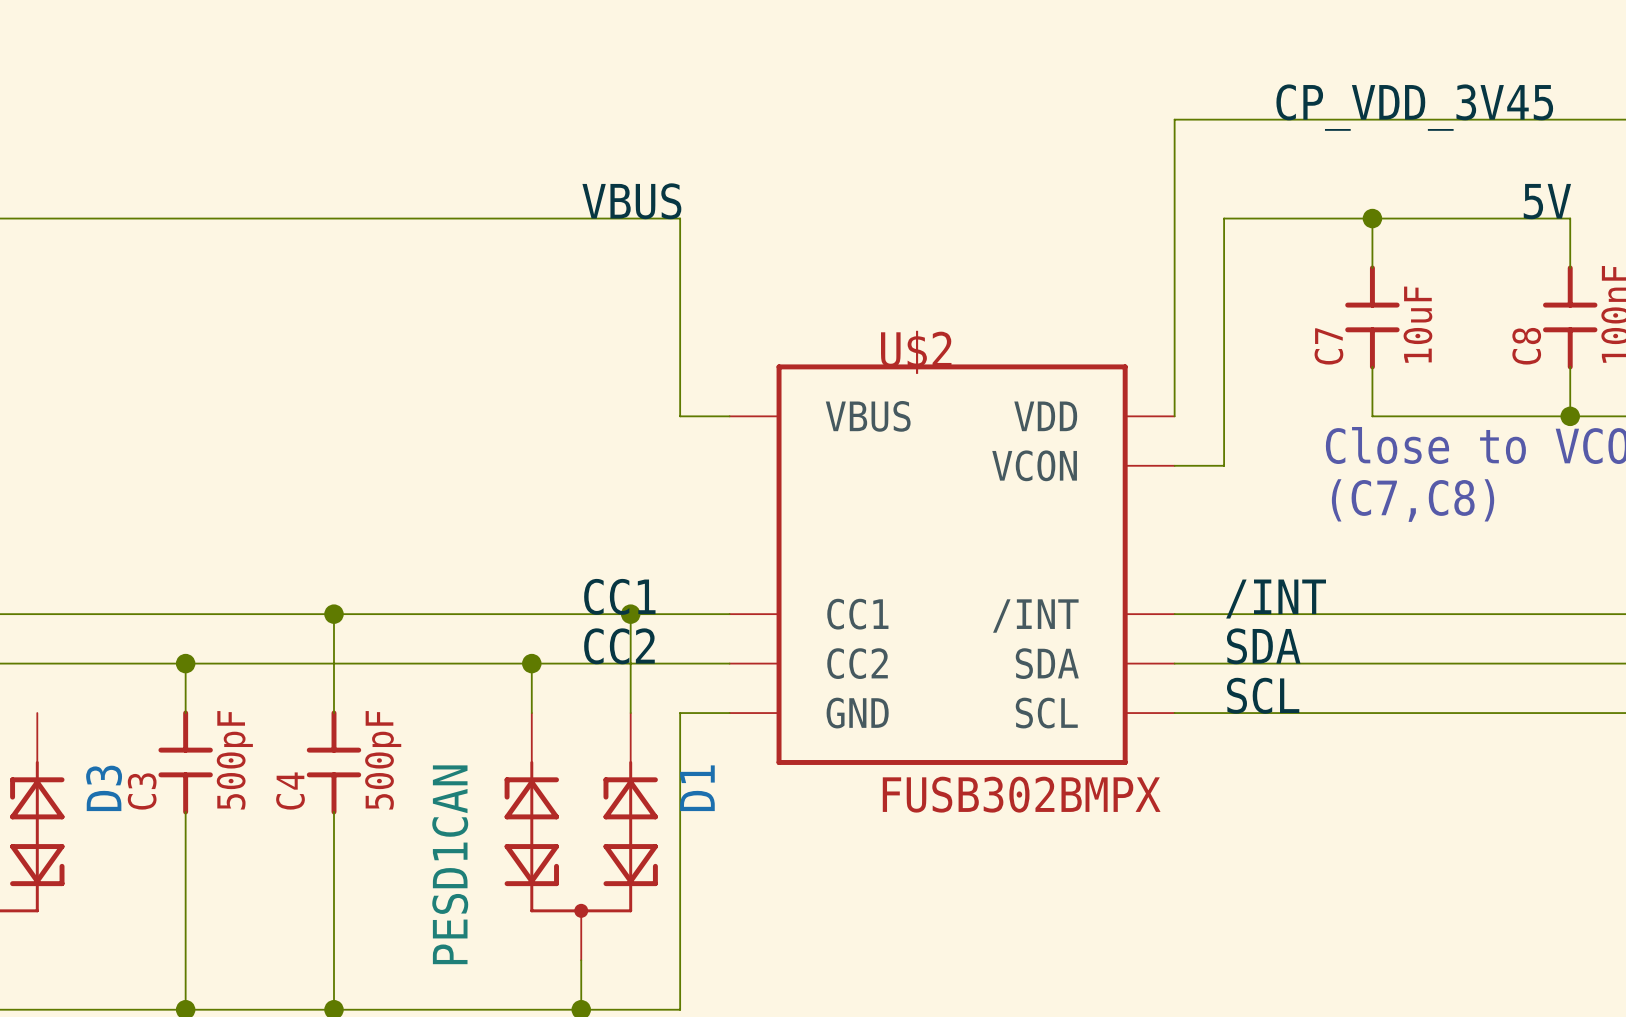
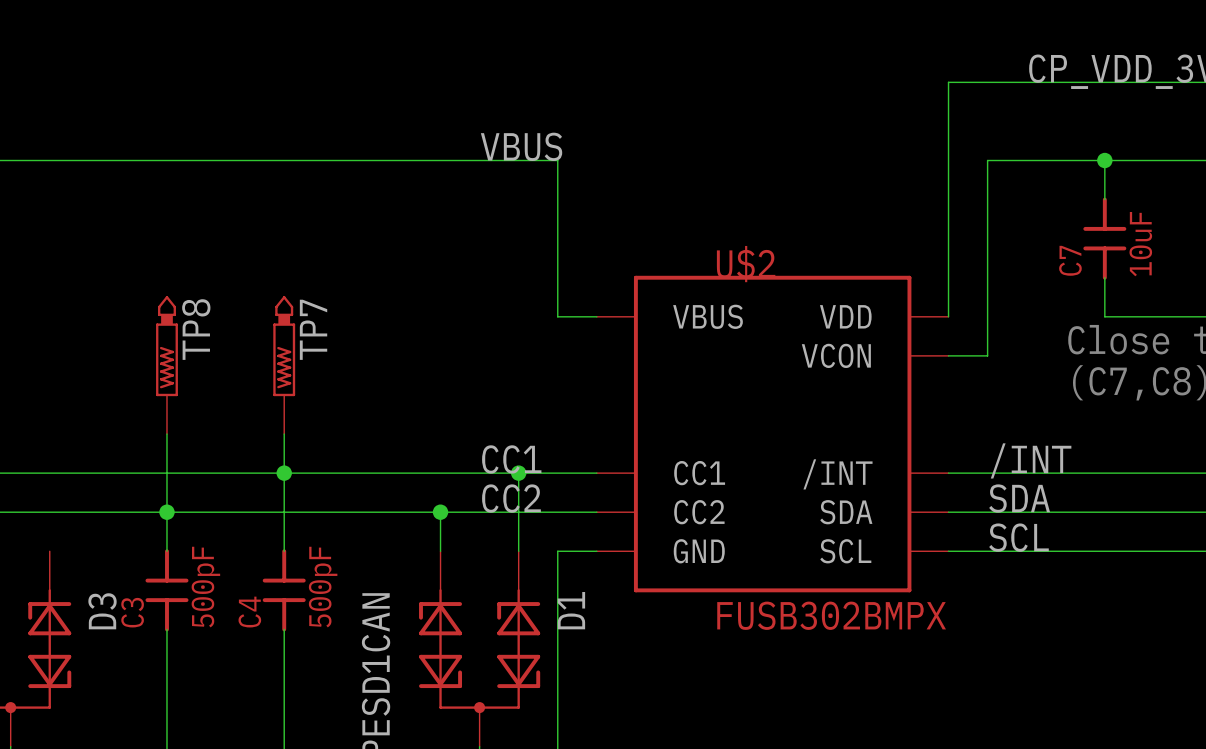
TP8: none -> (166, 365)
TP7: none -> (284, 365)
wire: none -> (166, 434) (166, 512)
wire: none -> (284, 434) (284, 473)

